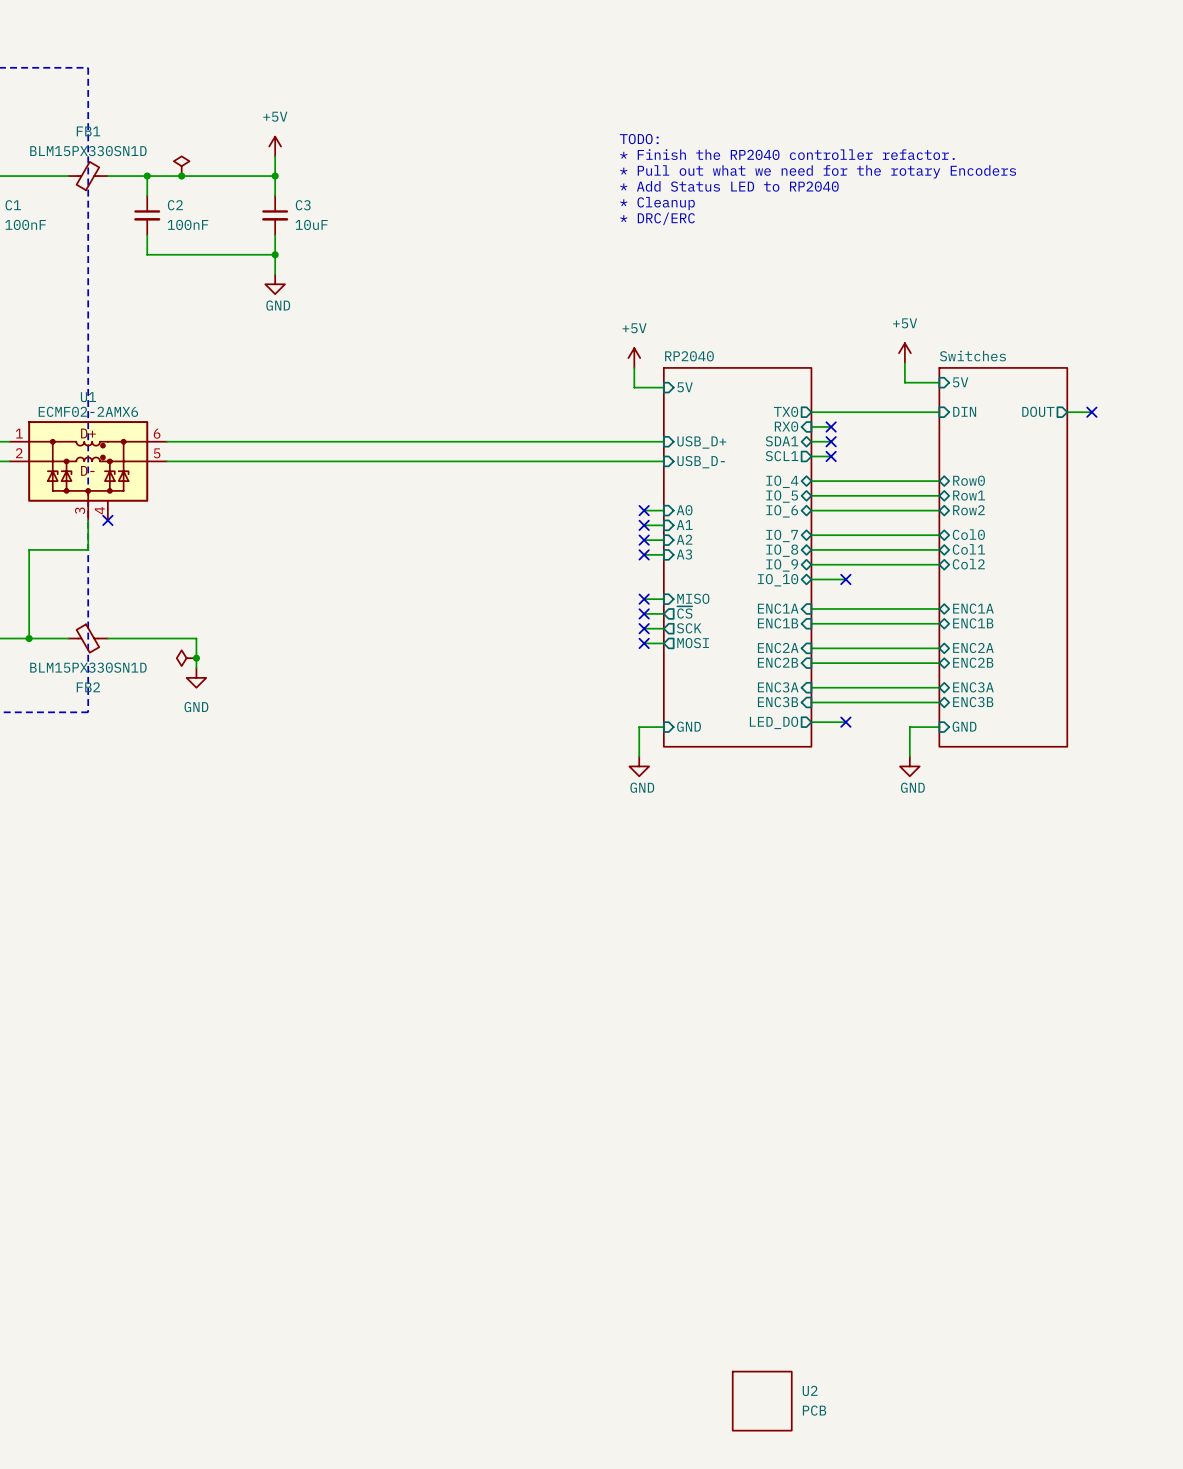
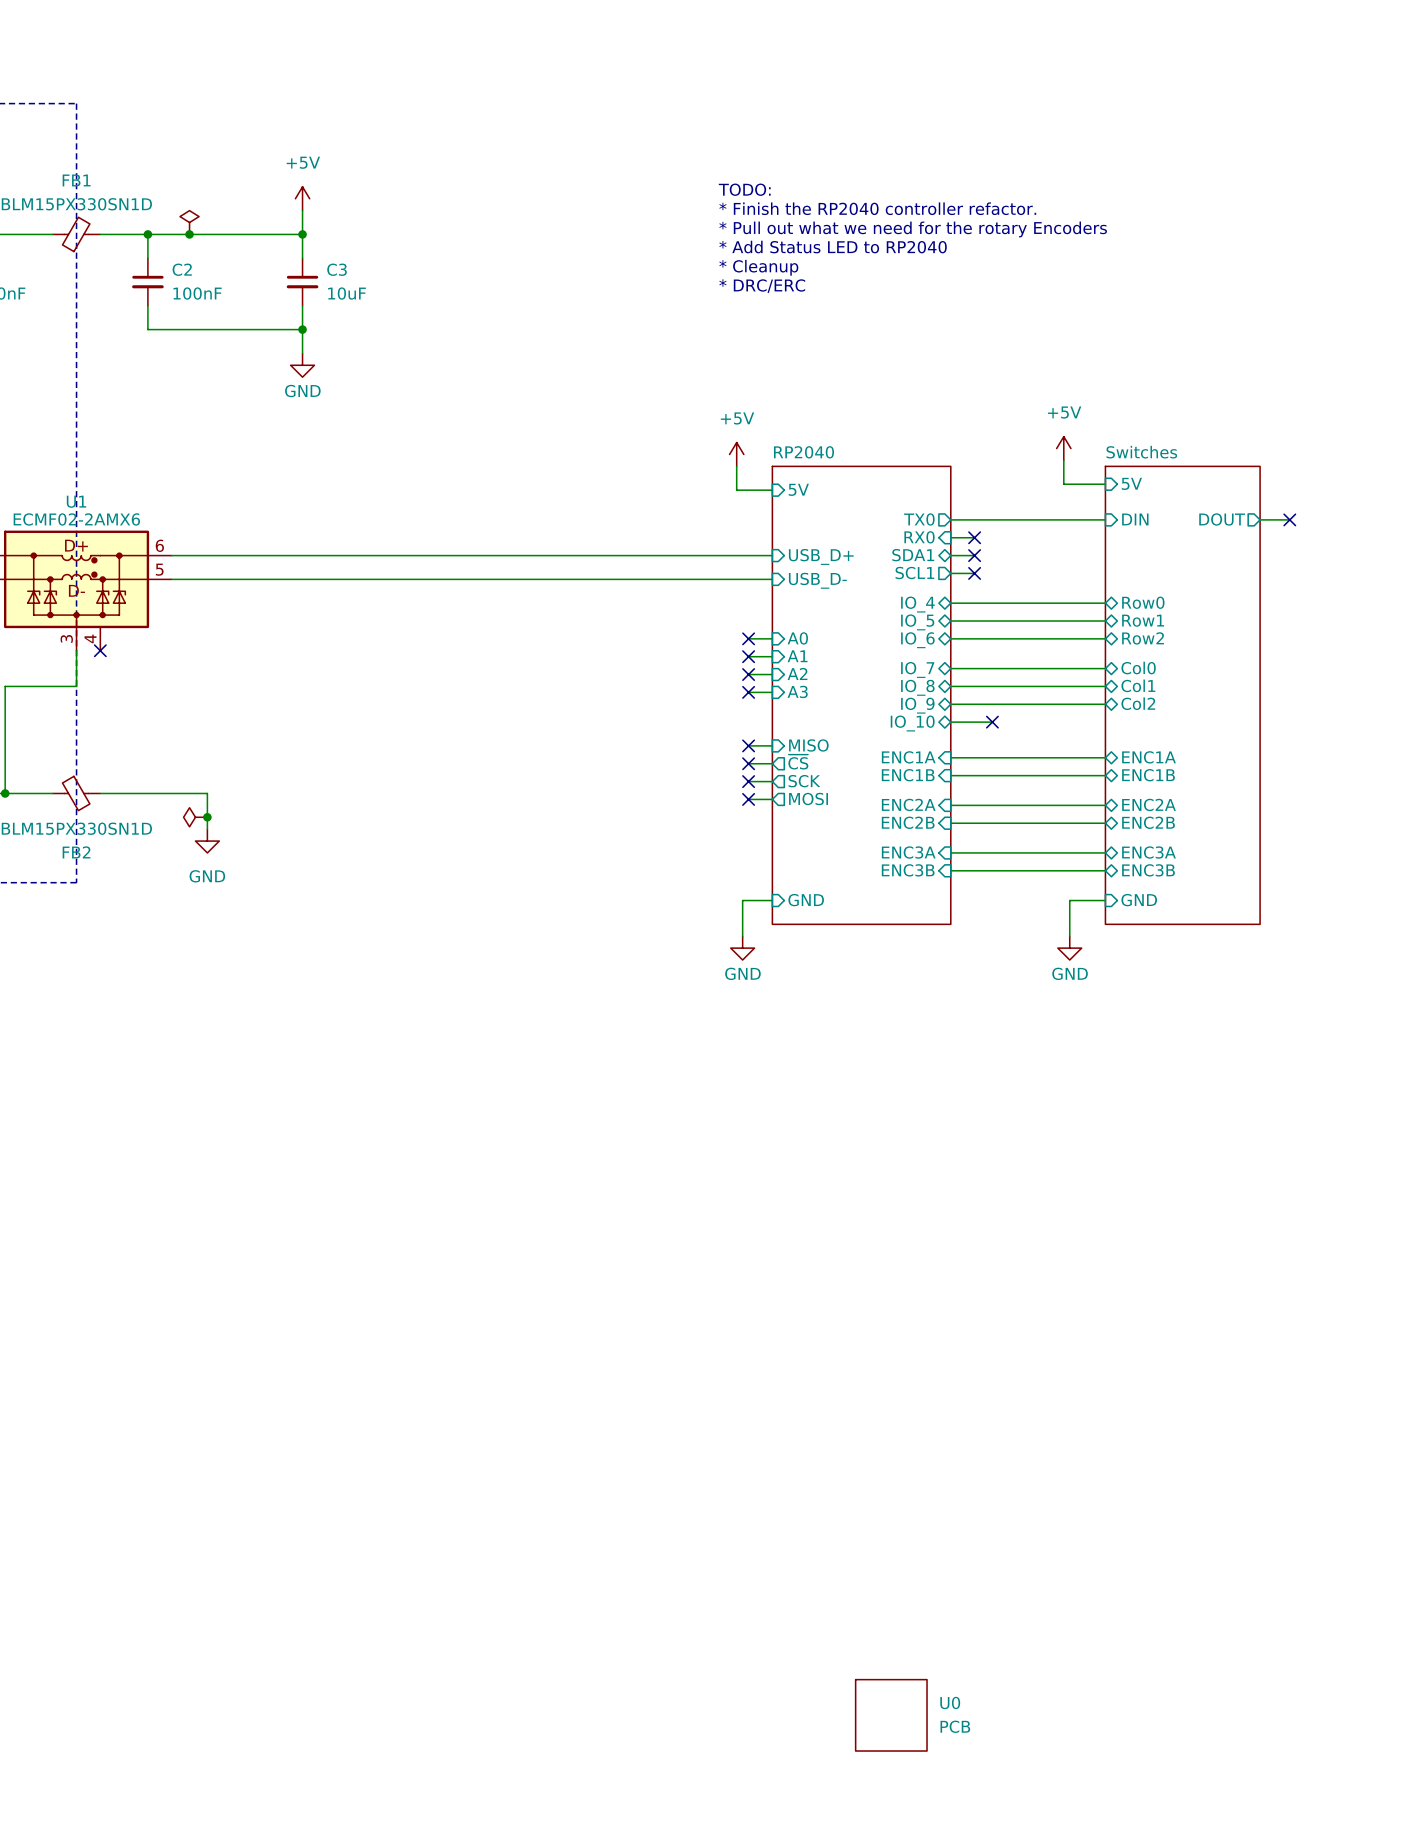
sheet pin: LED_DO (774, 722) -> none
wire: (811, 722) (845, 722) -> none
no-connect mark: (845, 722) -> none
U2 name: U2 (810, 1390) -> U0 (950, 1702)

